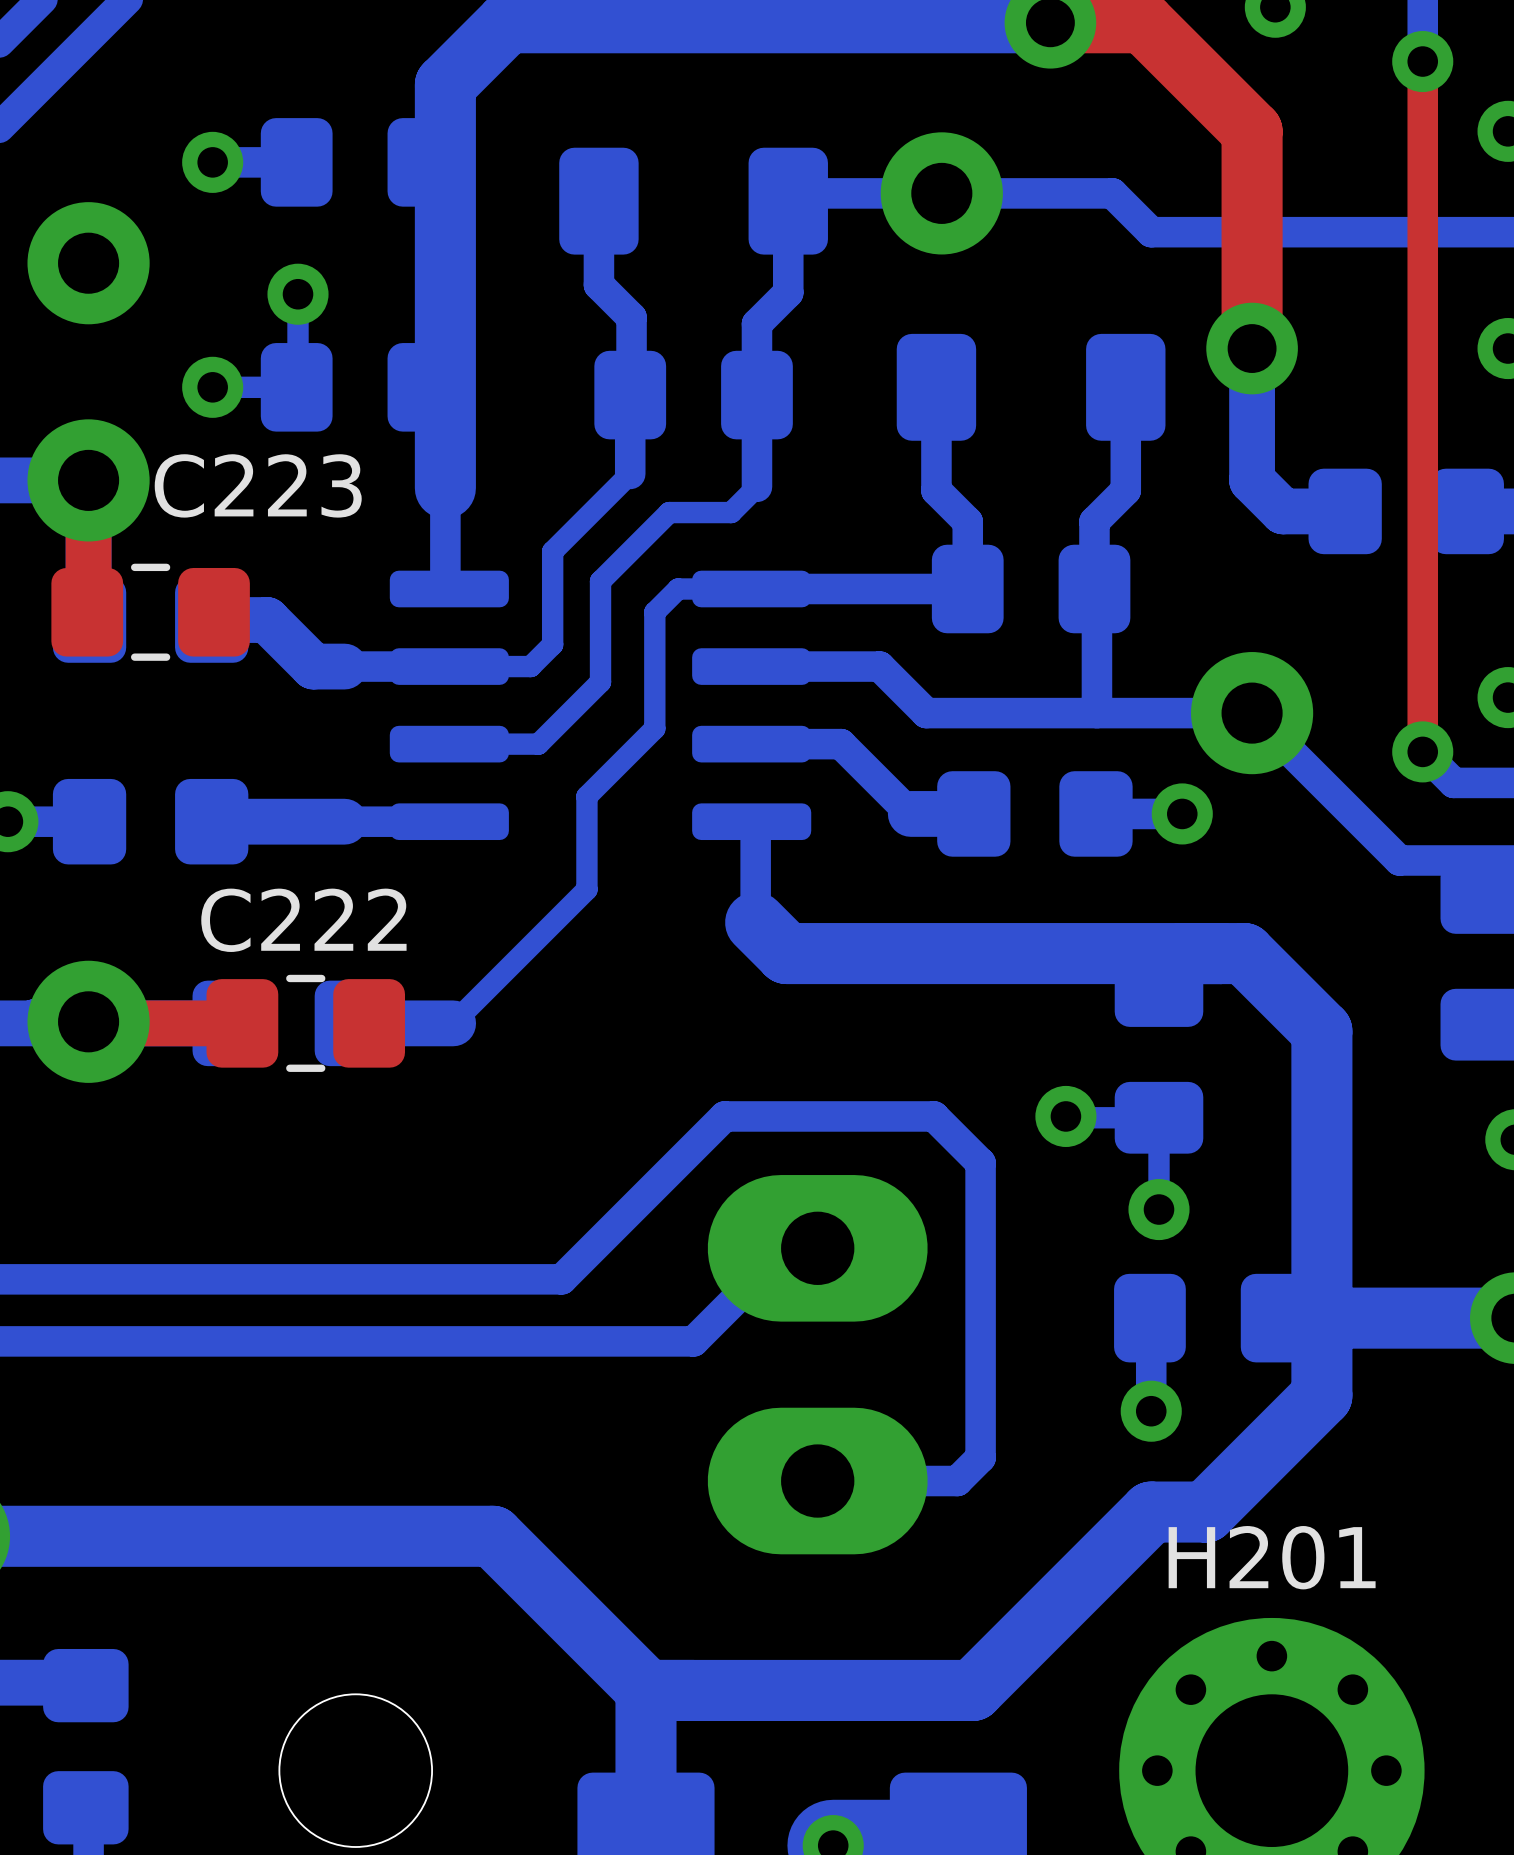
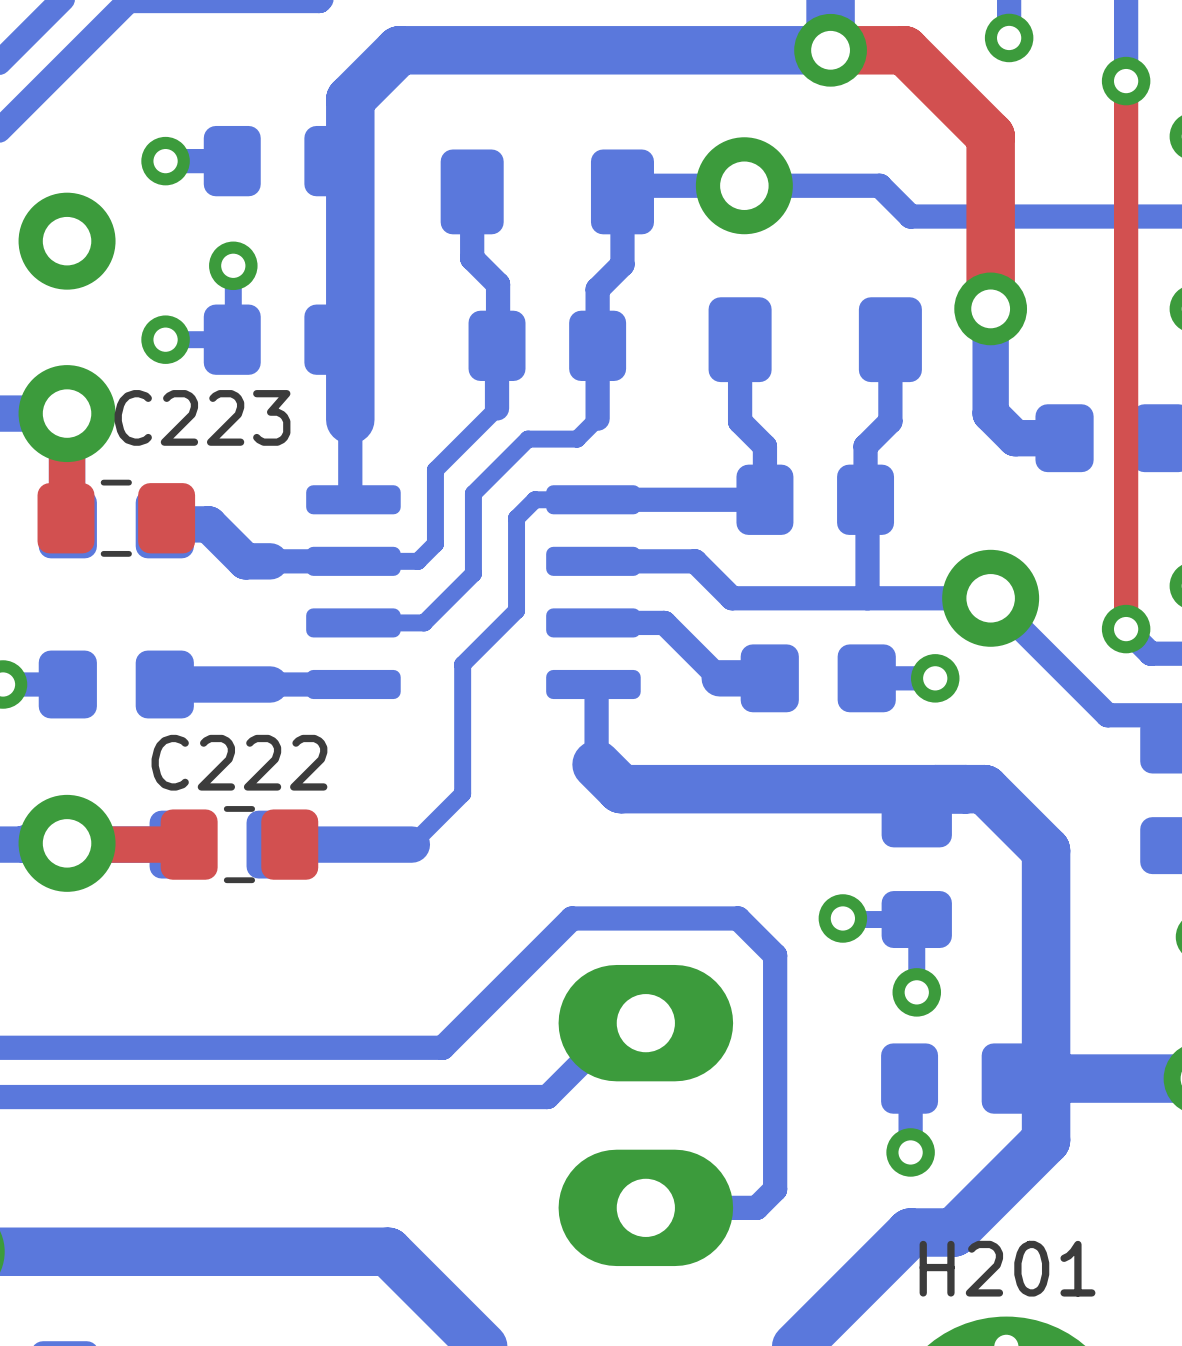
bottom track: (586, 889) (460, 1015) -> (462, 738) (462, 793) (411, 844) (356, 844)

